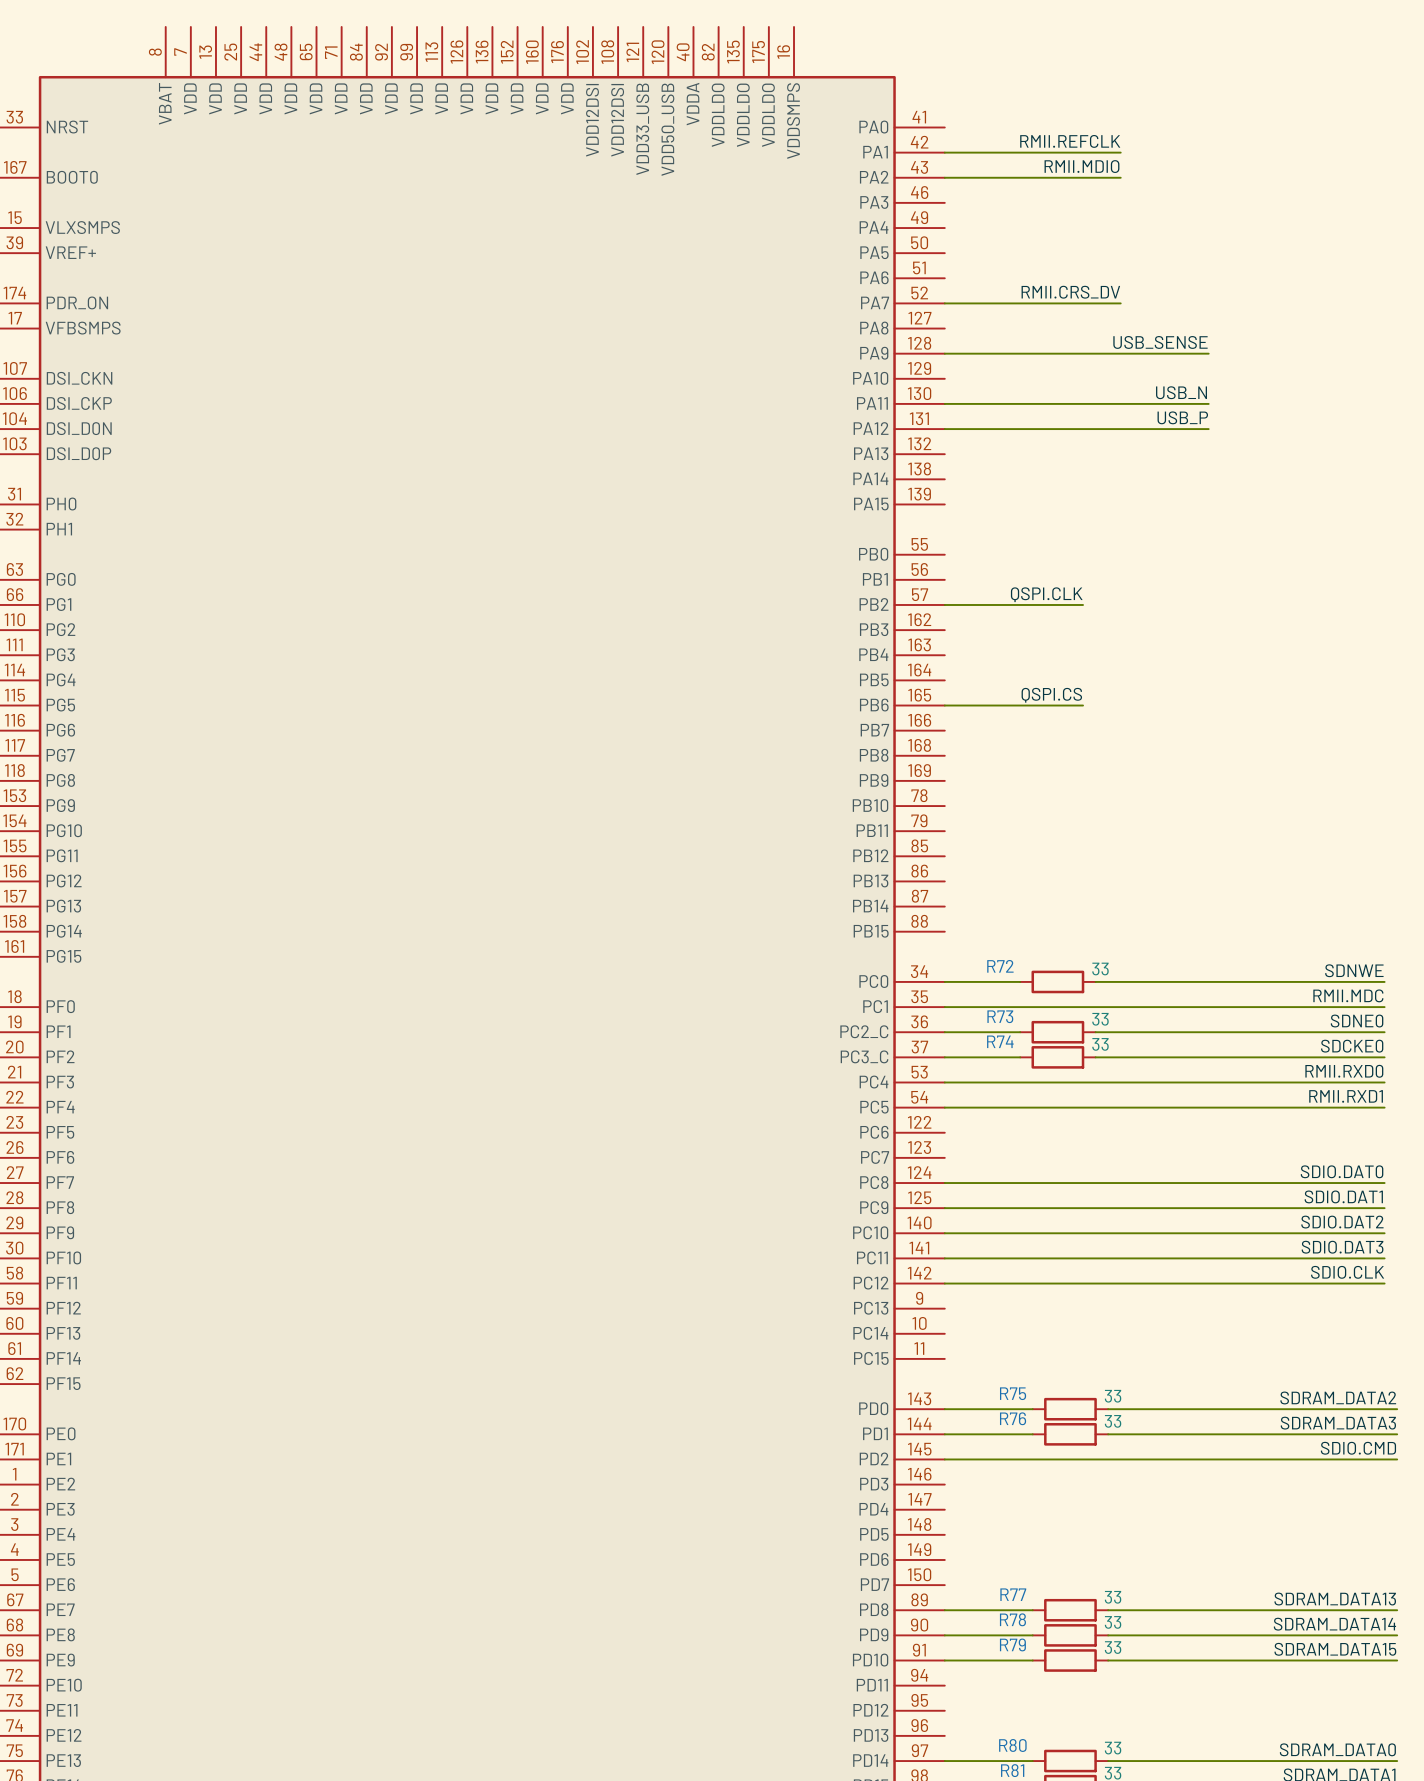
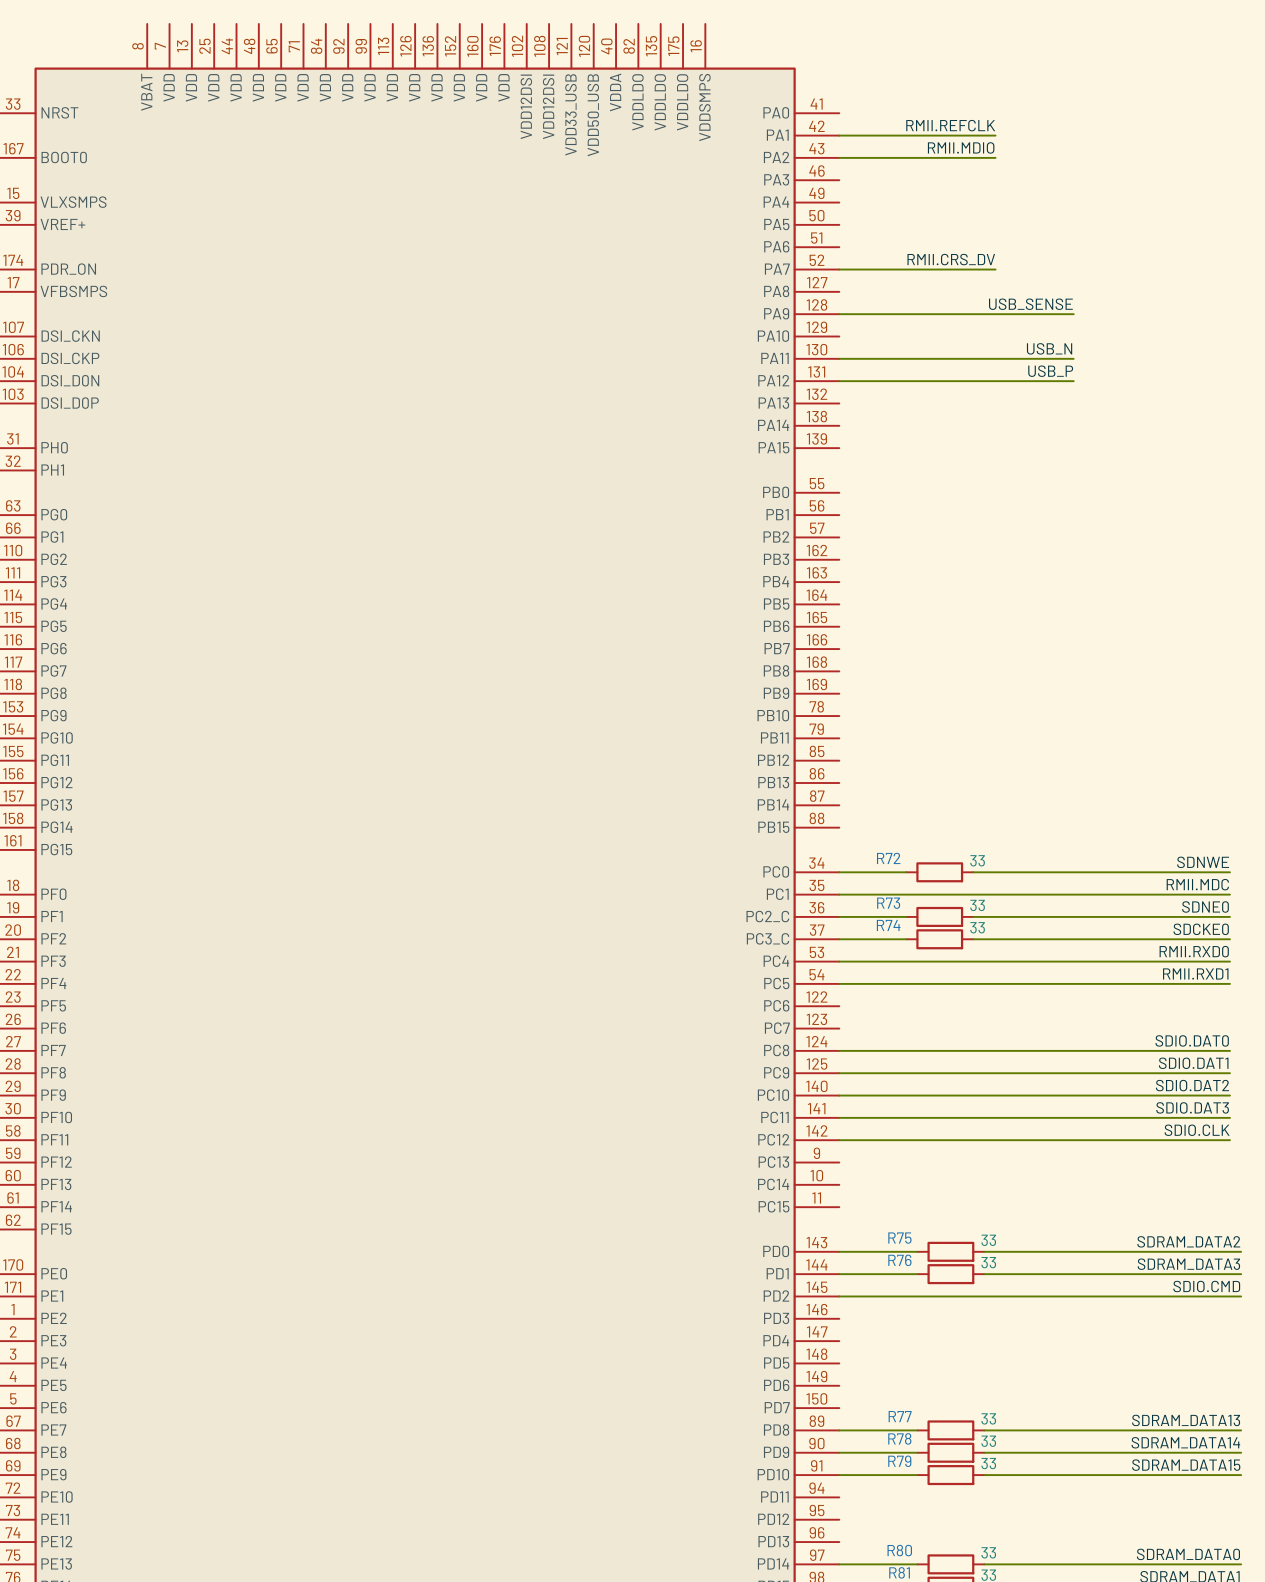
label: QSPI.CLK (1046, 594) -> none
wire: (944, 604) (1083, 604) -> none
label: QSPI.CS (1051, 695) -> none
wire: (944, 705) (1083, 705) -> none

